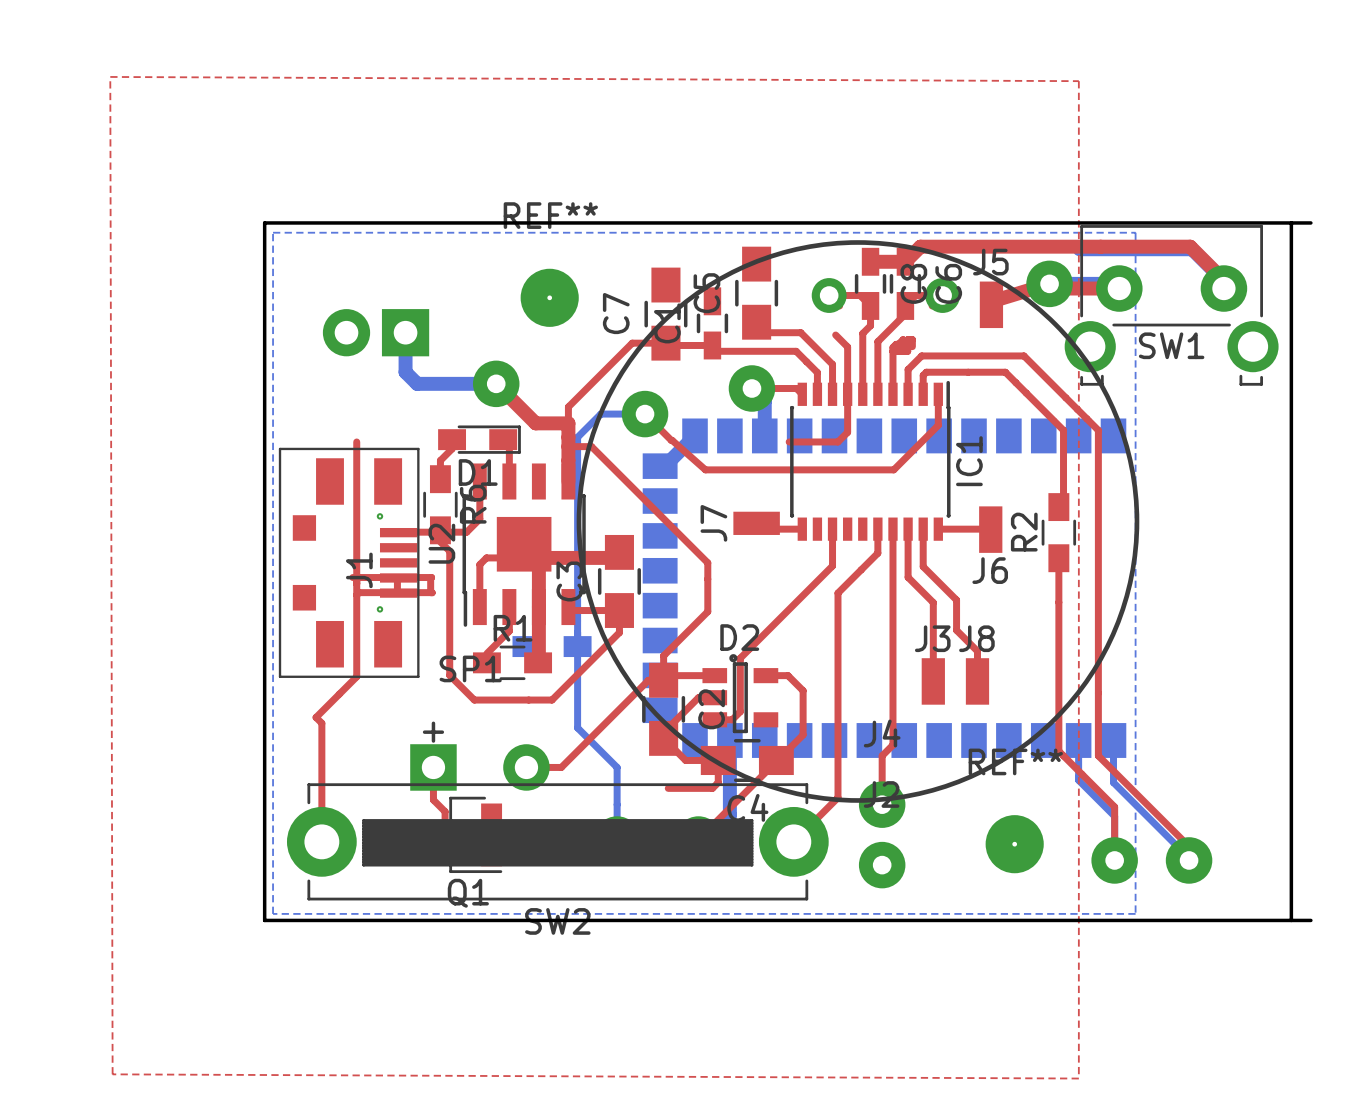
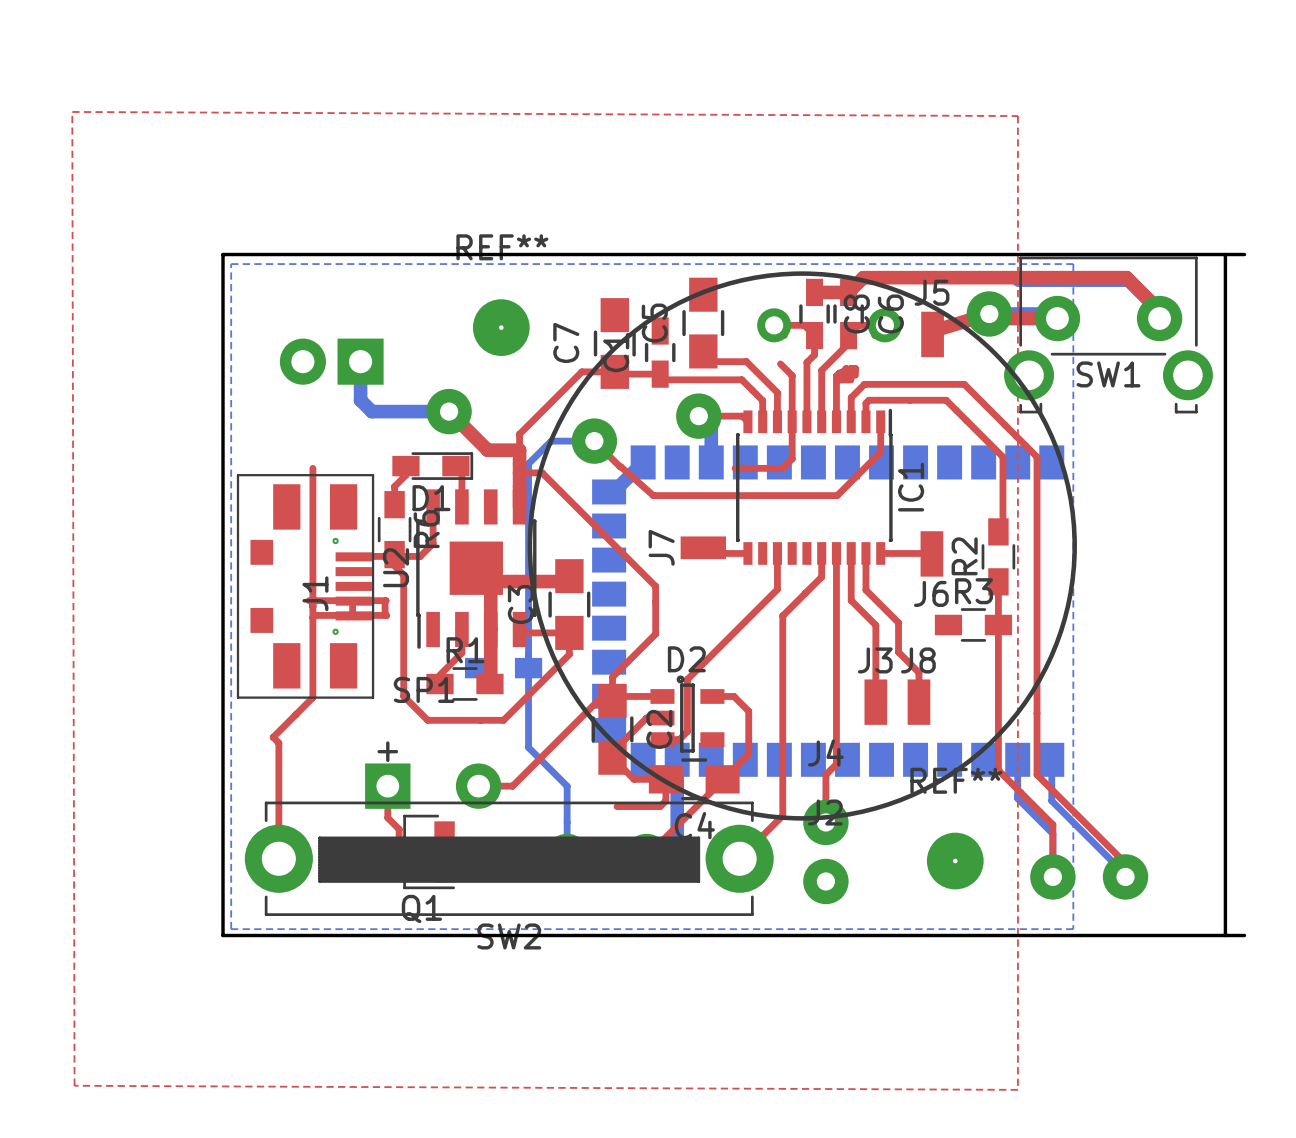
top track: (510, 557) (486, 557) (479, 564) (479, 607) -> none
R3: none -> (973, 624)

